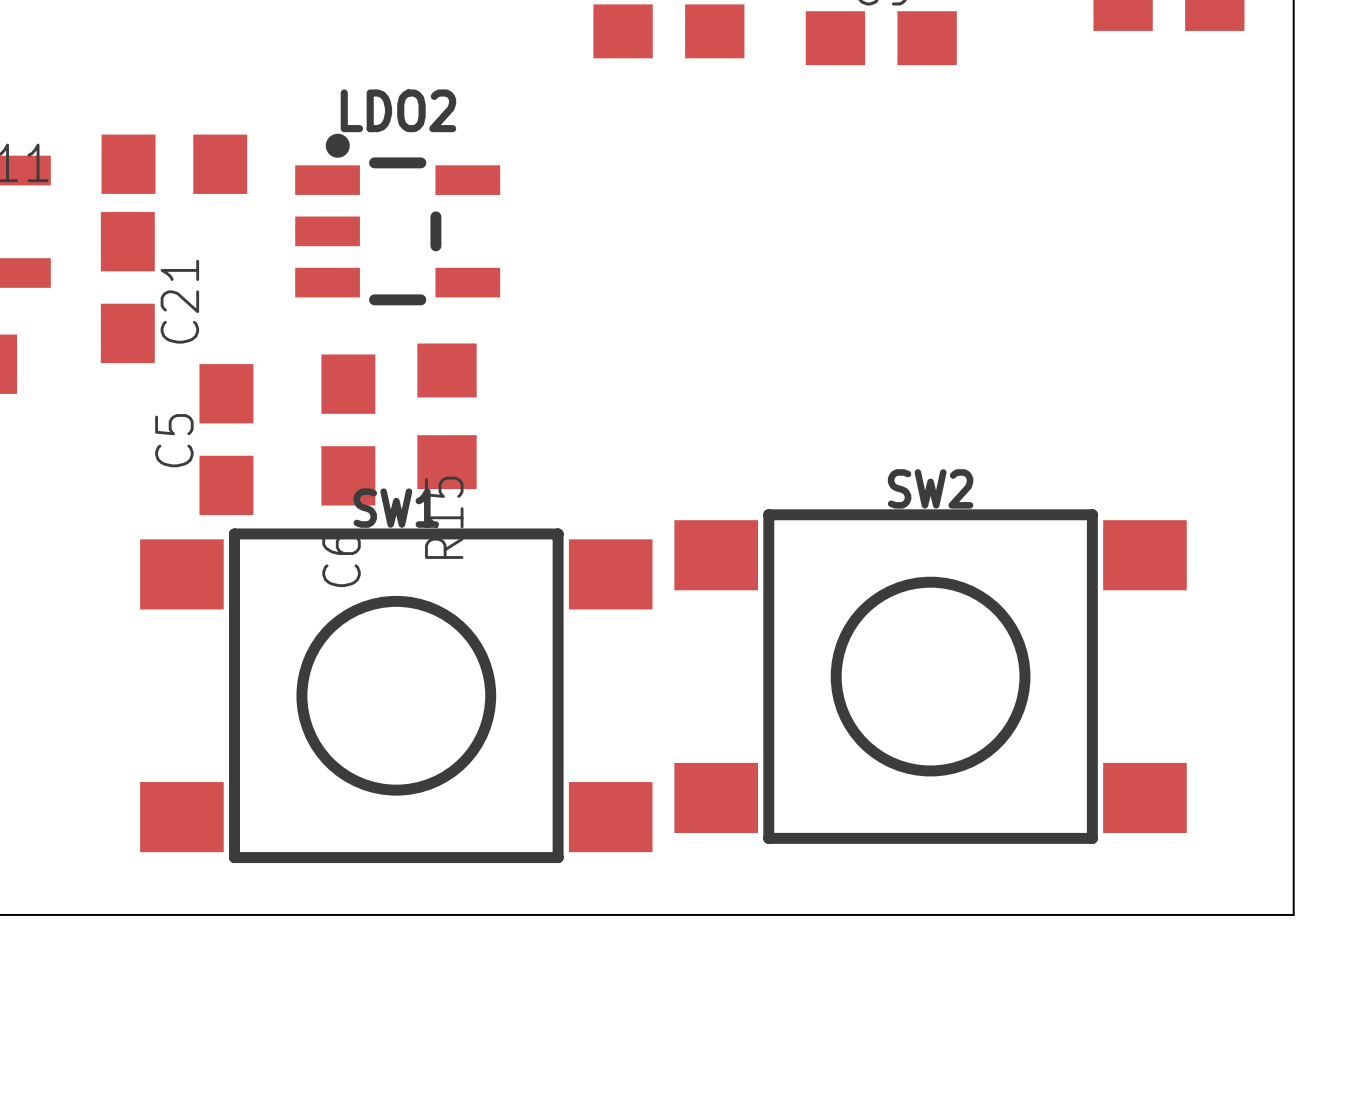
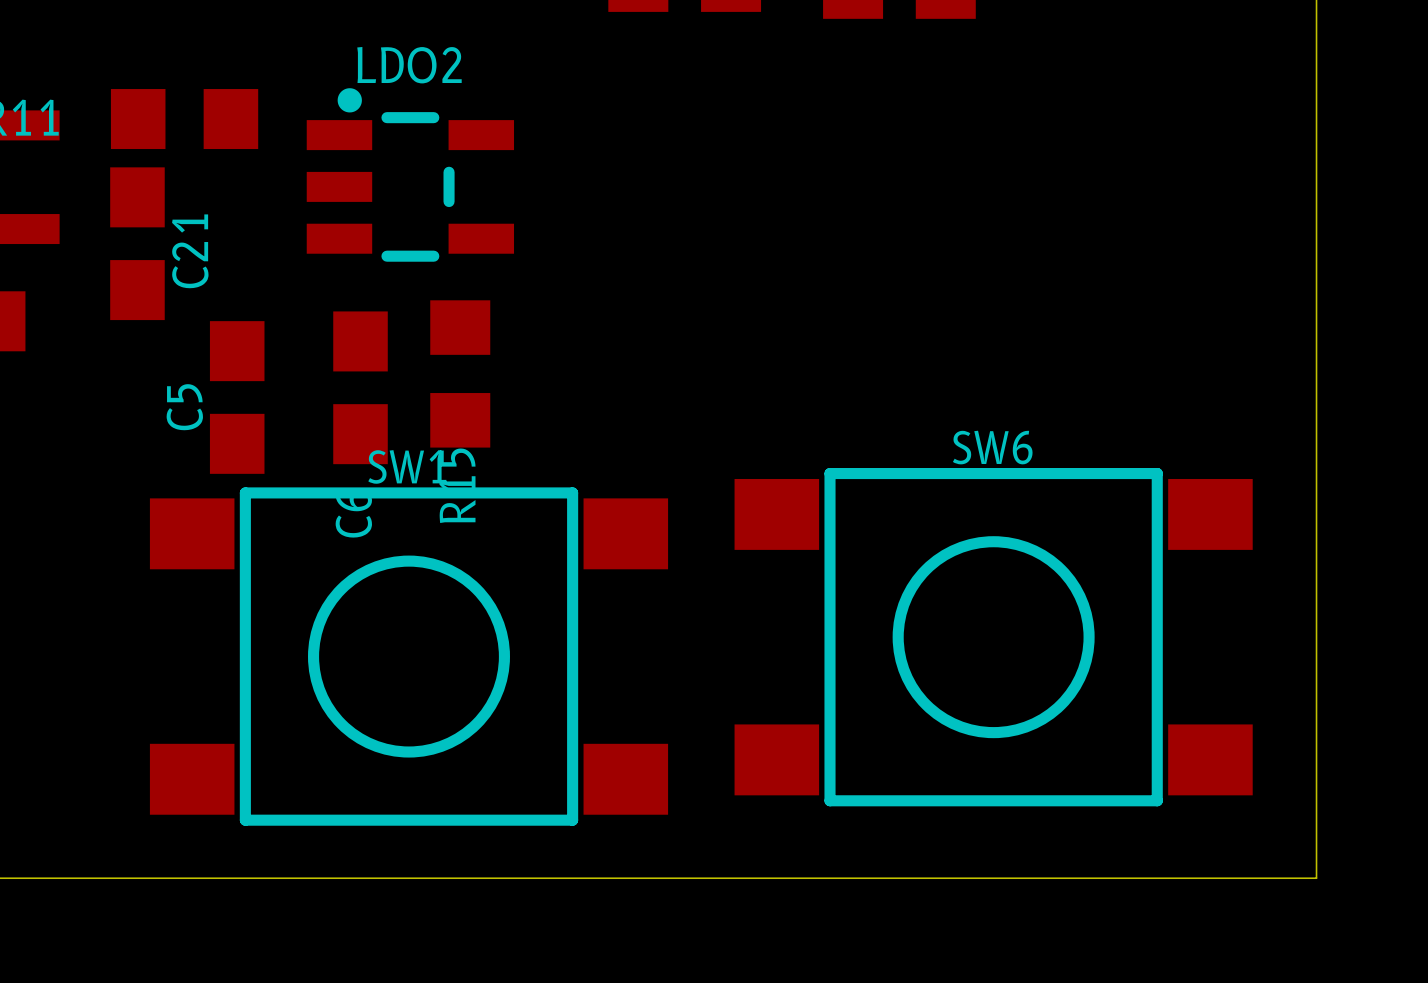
SW2 name: SW2 (930, 488) -> SW6 (992, 447)
SW2 position: (930, 676) -> (993, 637)

